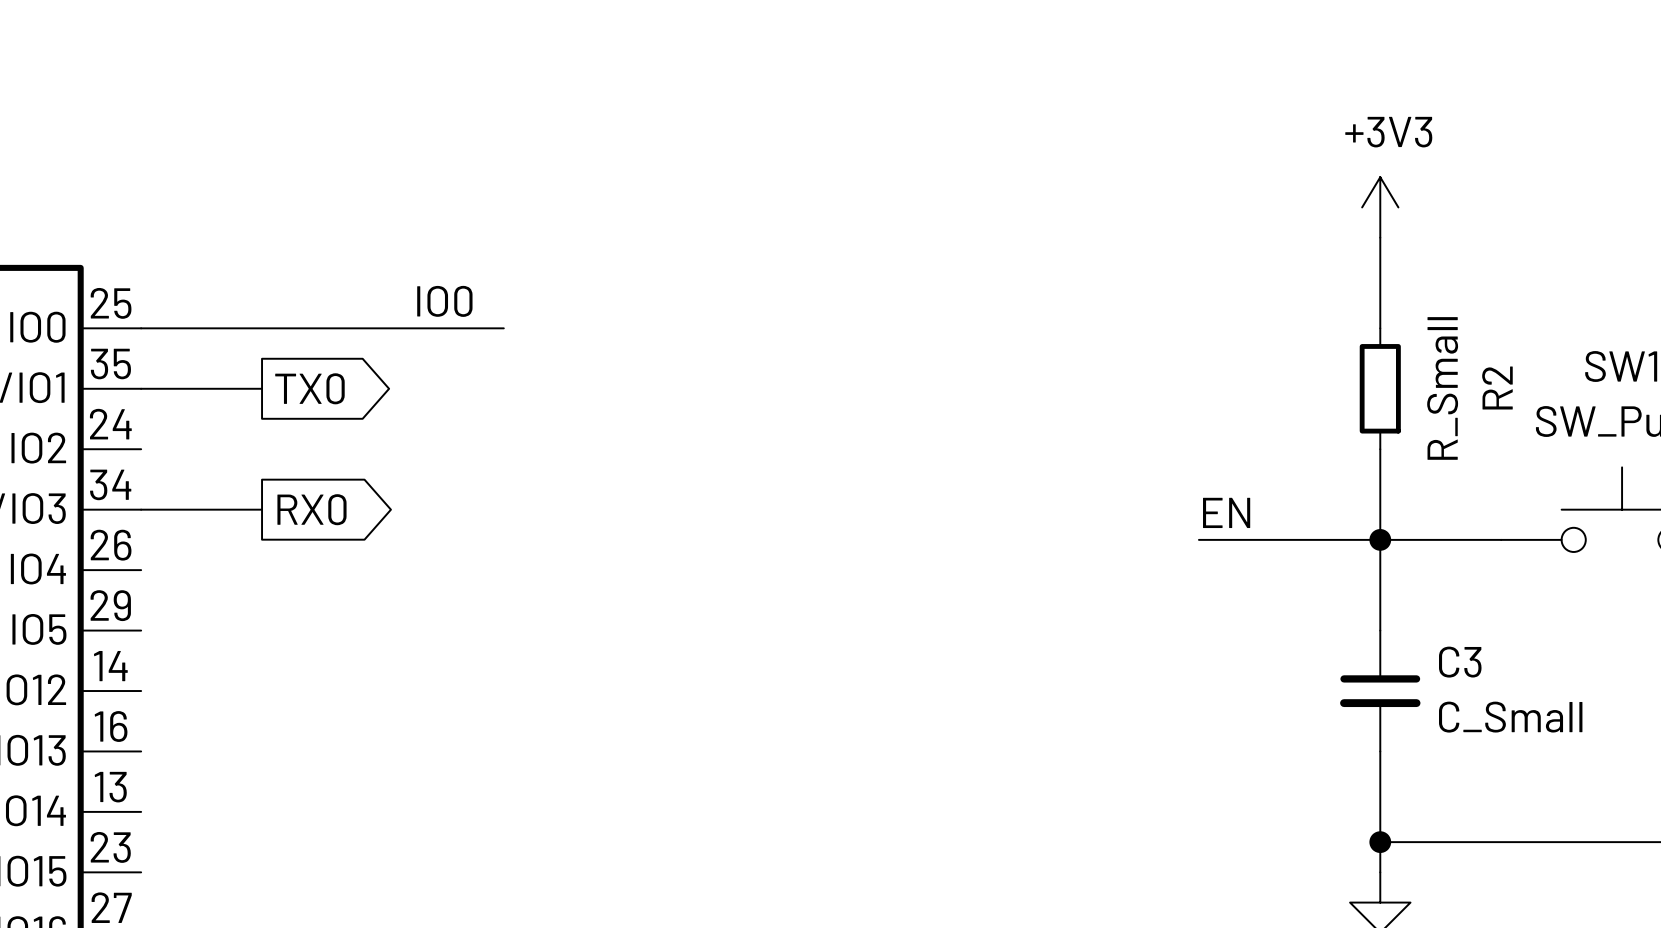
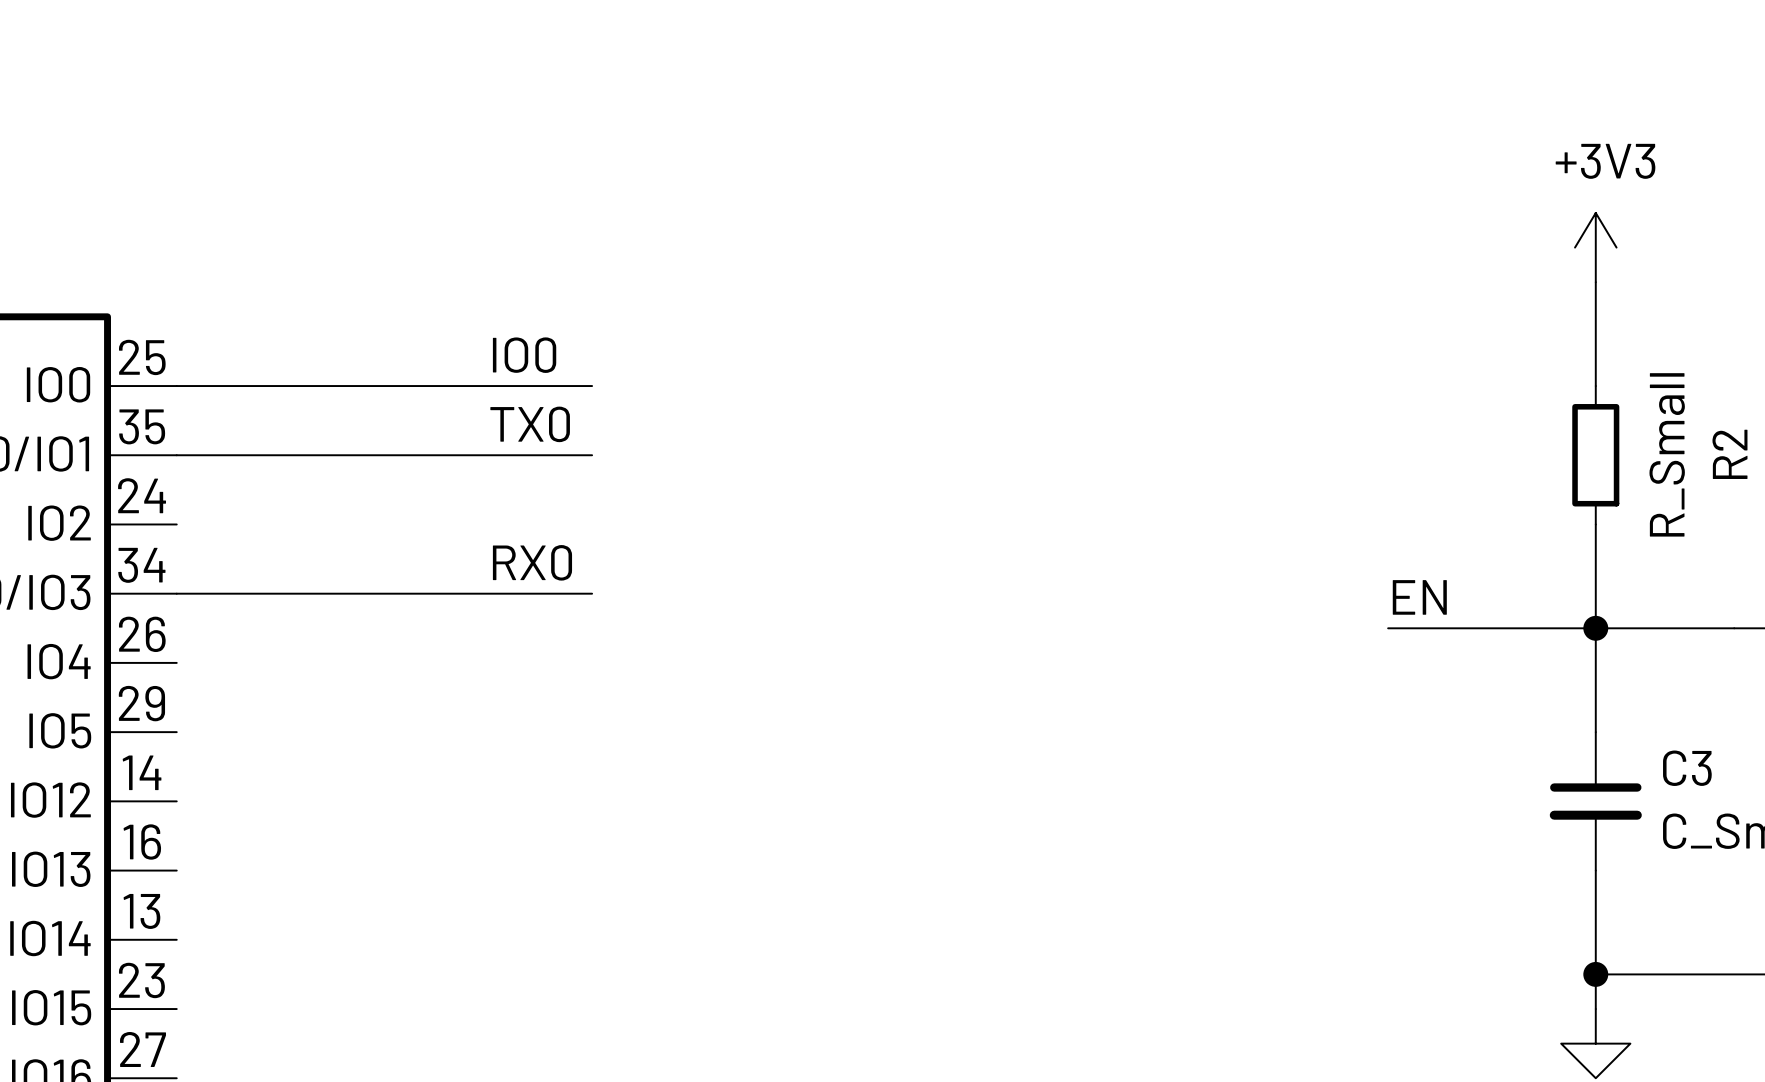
label: none -> TX0 (530, 424)
wire: none -> (315, 455) (592, 455)
global label: TX0 (309, 388) -> none
label: none -> RX0 (532, 562)
wire: none -> (315, 593) (592, 593)
global label: RX0 (311, 509) -> none

